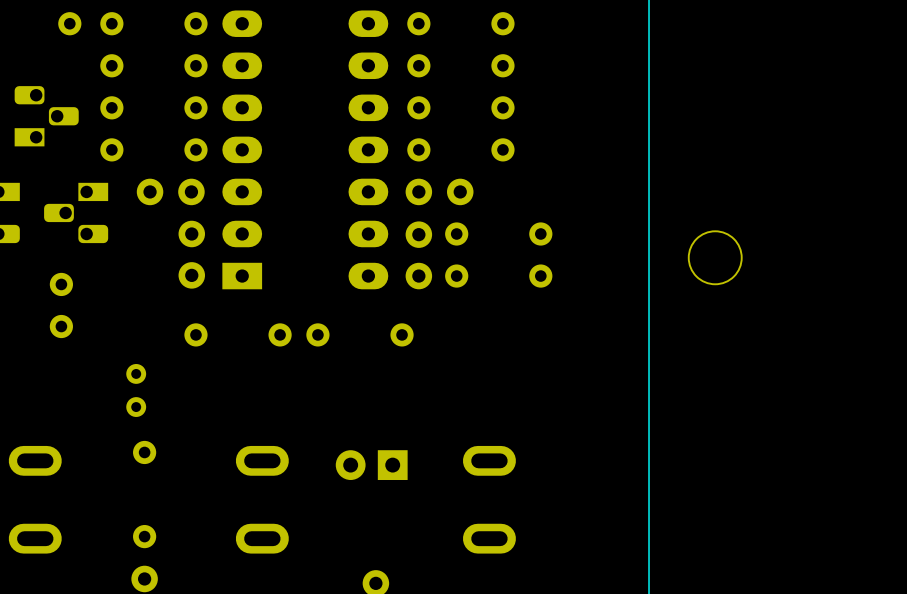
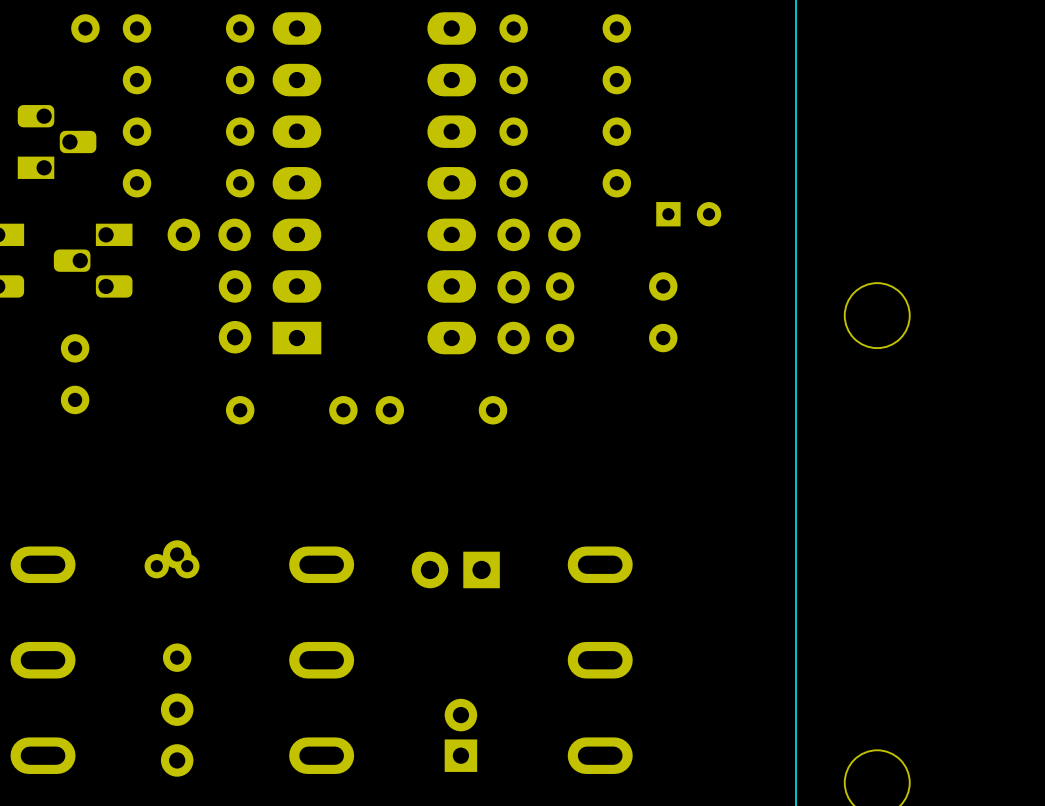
part: none -> (688, 214)
part: (136, 390) -> none
part: none -> (172, 566)

